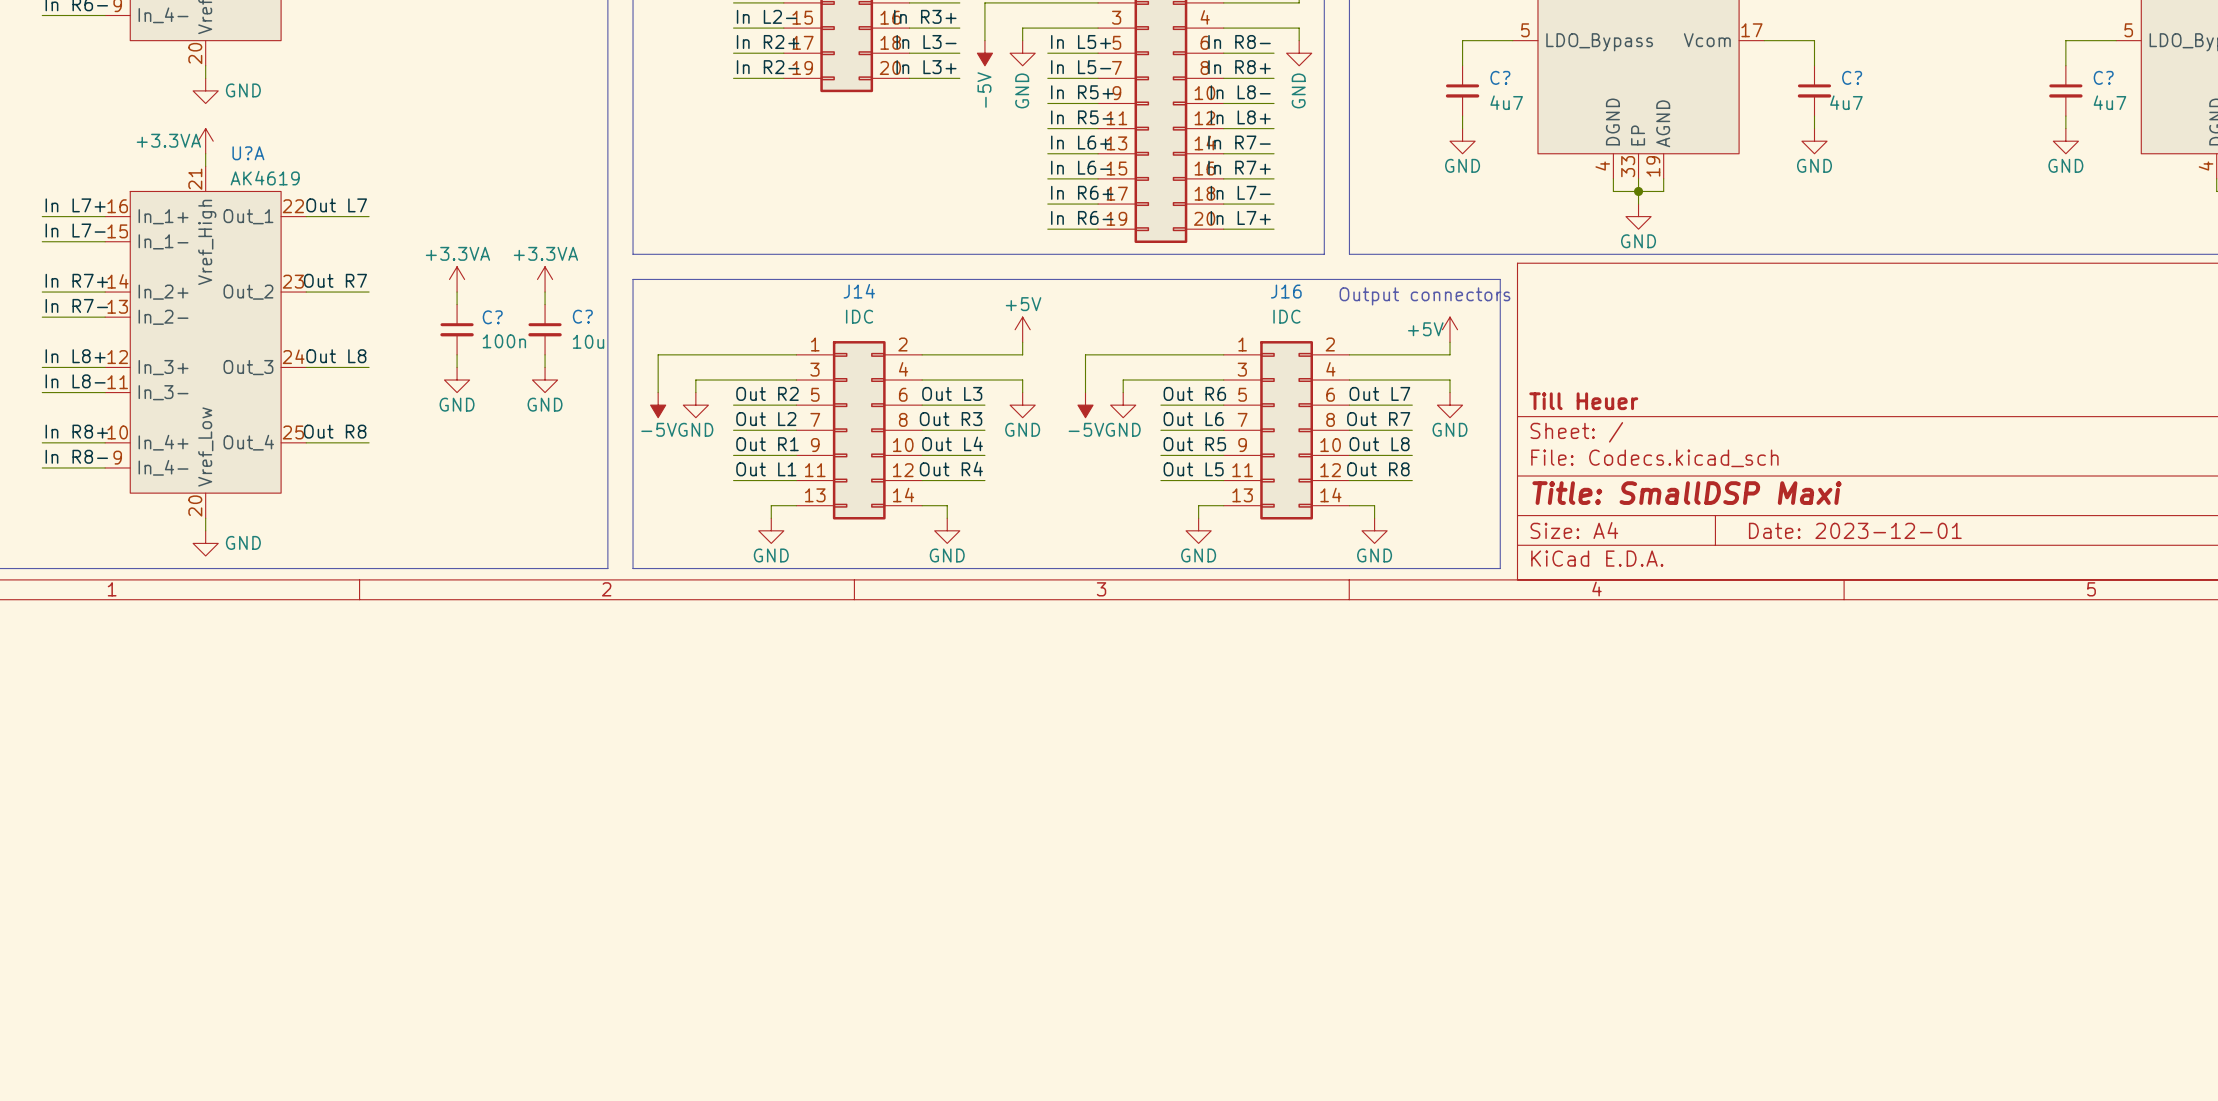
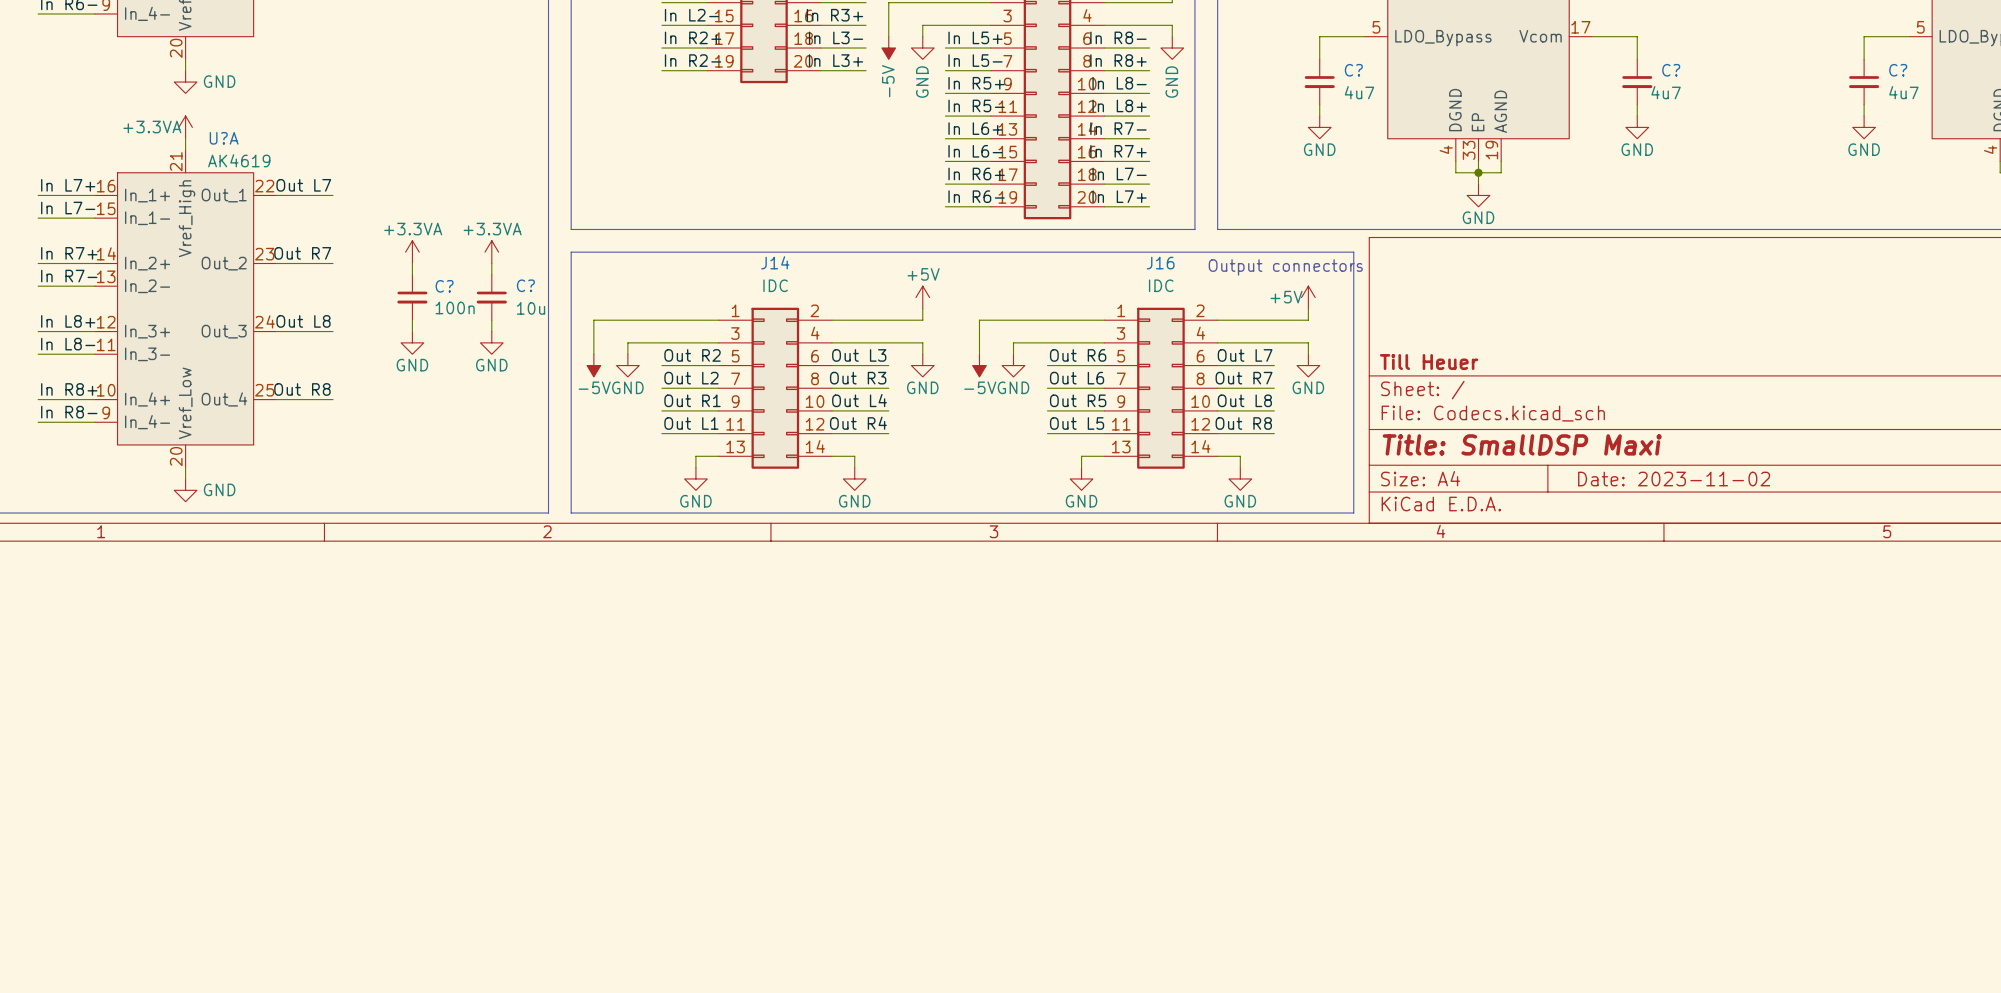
title block: Date: 2023-12-01 (1855, 530) -> Date: 2023-11-02 (1674, 479)

